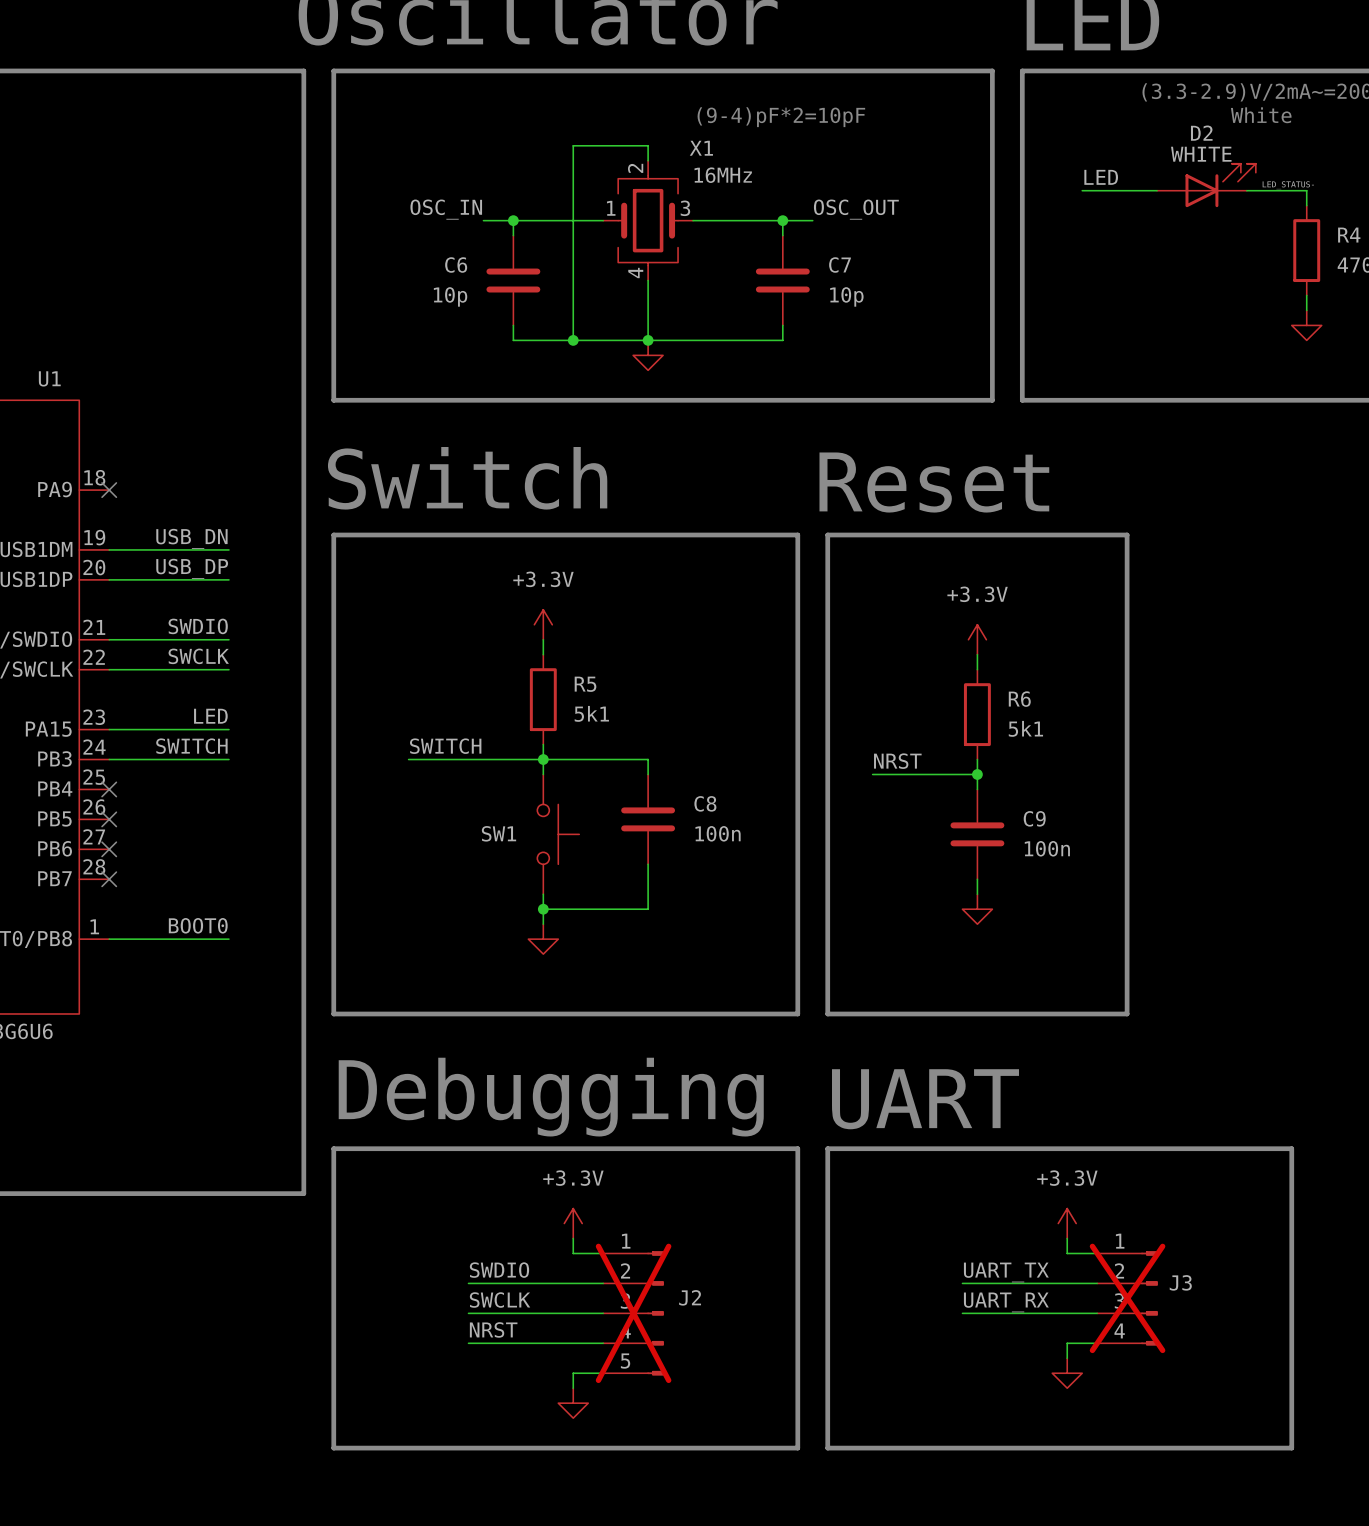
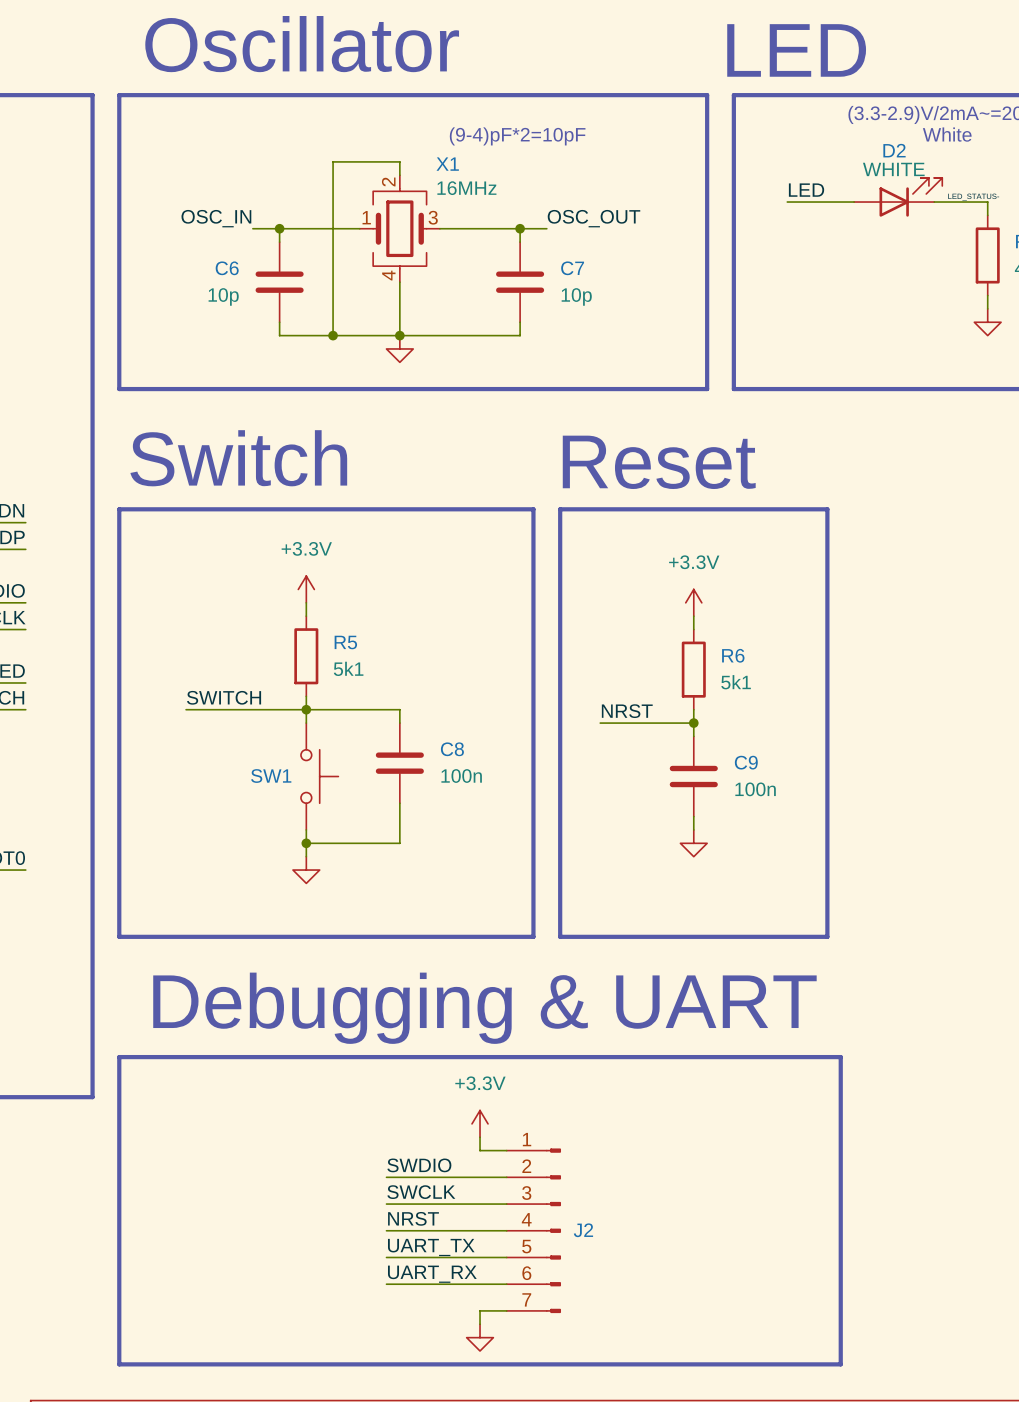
text: Debugging (551, 1097) -> Debugging & UART (484, 1008)
text: UART (925, 1099) -> none
line: (797, 1148) (797, 1448) (333, 1448) -> (840, 1057) (840, 1364) (119, 1364) (119, 1324)
line: (827, 1148) (827, 1448) (1291, 1448) (1291, 1148) (1142, 1148) -> (560, 1057) (533, 1057)
power symbol: +3.3V (573, 1223) -> none
power symbol: none -> +3.3V (480, 1123)
power symbol: +3.3V (1067, 1223) -> none
wire: (573, 1238) (573, 1253) (603, 1253) -> (480, 1137) (480, 1150) (506, 1150)
wire: (1067, 1238) (1067, 1253) (1097, 1253) -> none
J2 symbol: [603, 1251, 664, 1376] -> [506, 1148, 561, 1314]
label position: SWDIO (499, 1270) -> SWDIO (419, 1165)
label: UART_TX (1006, 1272) -> none
wire: (468, 1283) (603, 1283) -> (386, 1177) (506, 1177)
wire: (962, 1283) (1097, 1283) -> none
J3: (1127, 1298) -> none
label position: SWCLK (500, 1300) -> SWCLK (421, 1192)
label: UART_RX (1006, 1302) -> none
wire: (468, 1313) (603, 1313) -> (386, 1204) (506, 1204)
J2 do-not-place cross: (633, 1313) -> none
wire: (962, 1313) (1097, 1313) -> none
label position: NRST (493, 1329) -> NRST (413, 1218)
wire: (468, 1343) (603, 1343) -> (386, 1230) (506, 1230)
wire: (1097, 1343) (1067, 1343) (1067, 1358) -> none
label: none -> UART_TX (431, 1247)
wire: (603, 1373) (573, 1373) (573, 1388) -> (506, 1310) (480, 1310) (480, 1324)
wire: none -> (386, 1257) (506, 1257)
power symbol: (1067, 1373) -> none
label: none -> UART_RX (432, 1274)
power symbol: (573, 1403) -> none
wire: none -> (386, 1284) (506, 1284)
power symbol: none -> (480, 1337)

